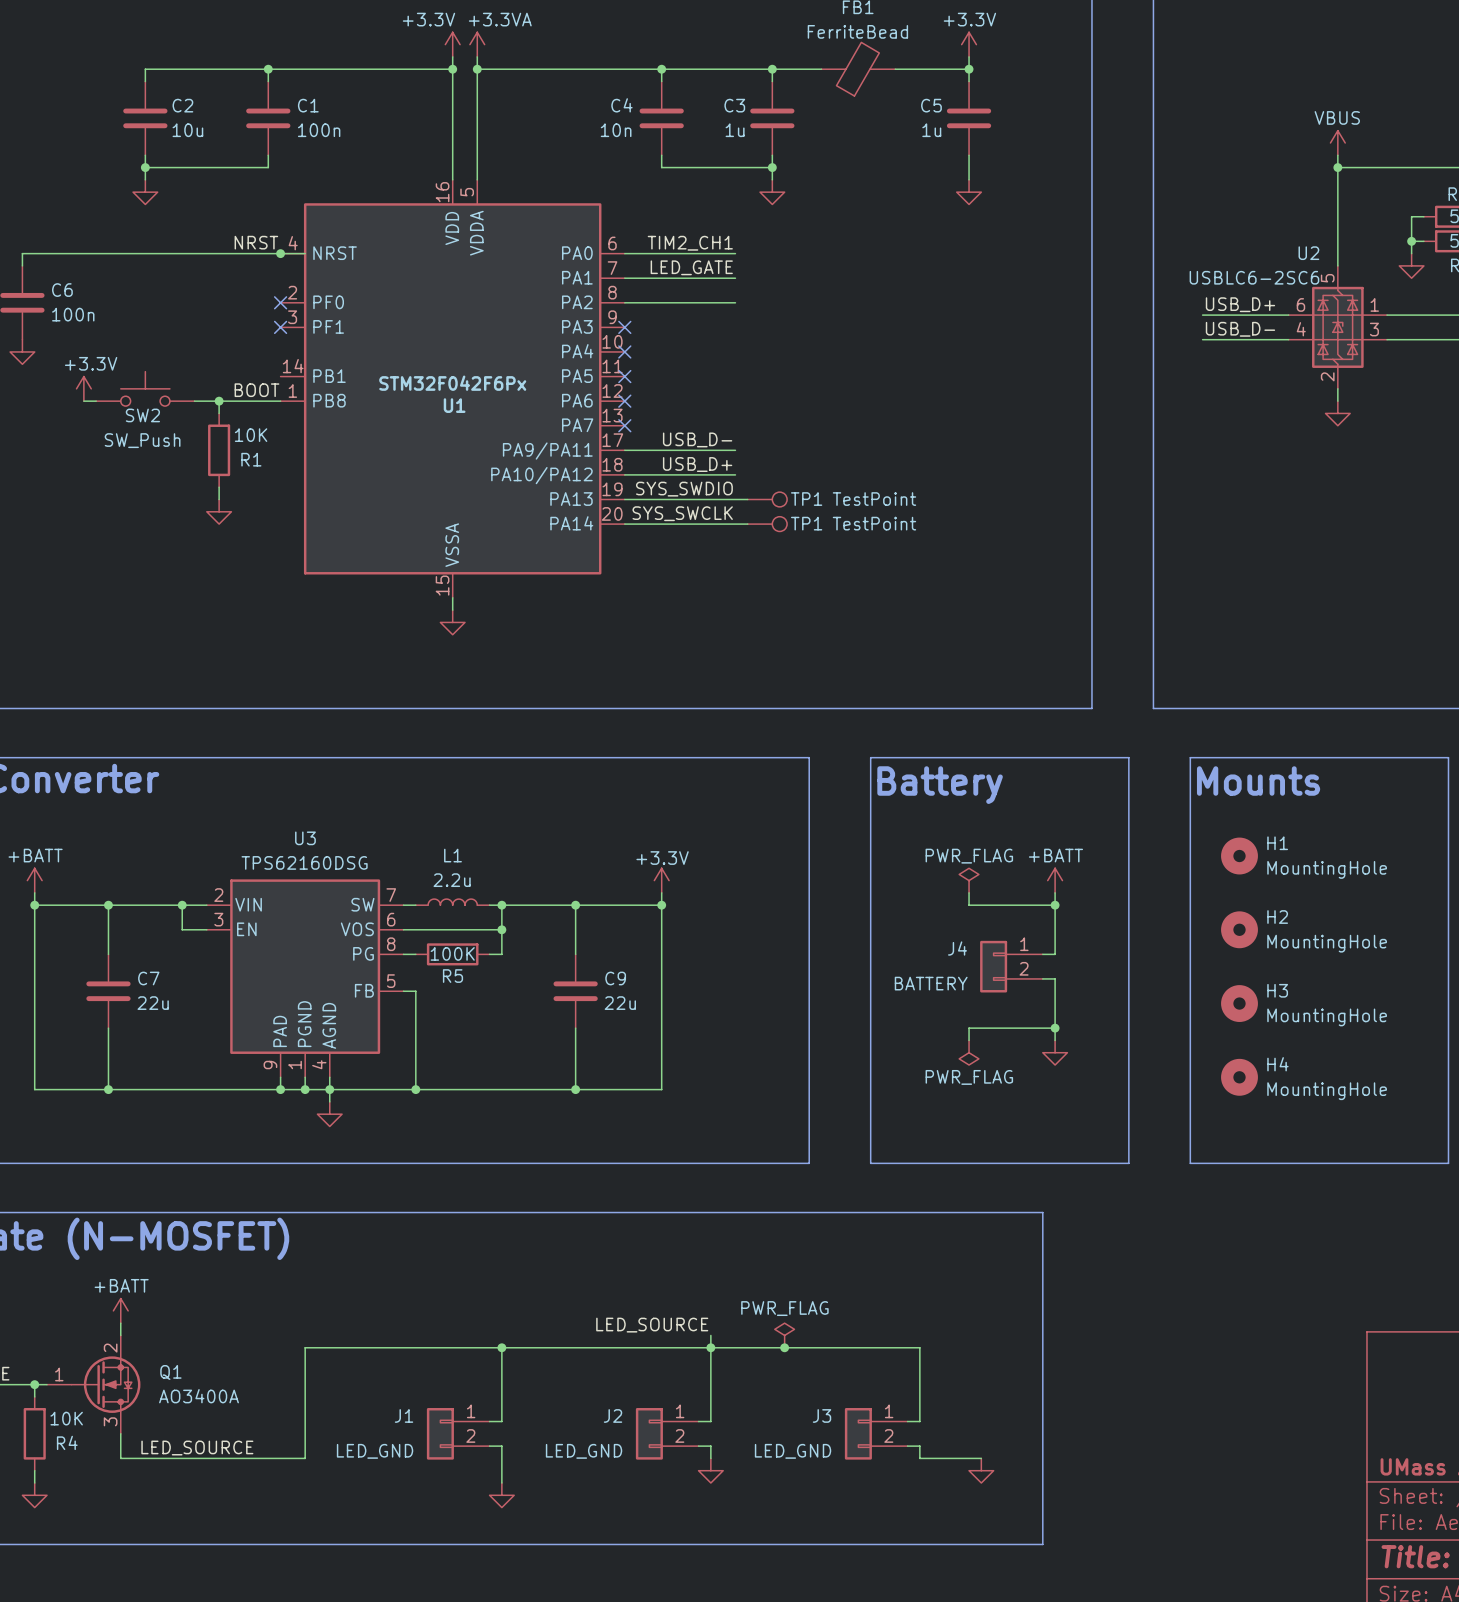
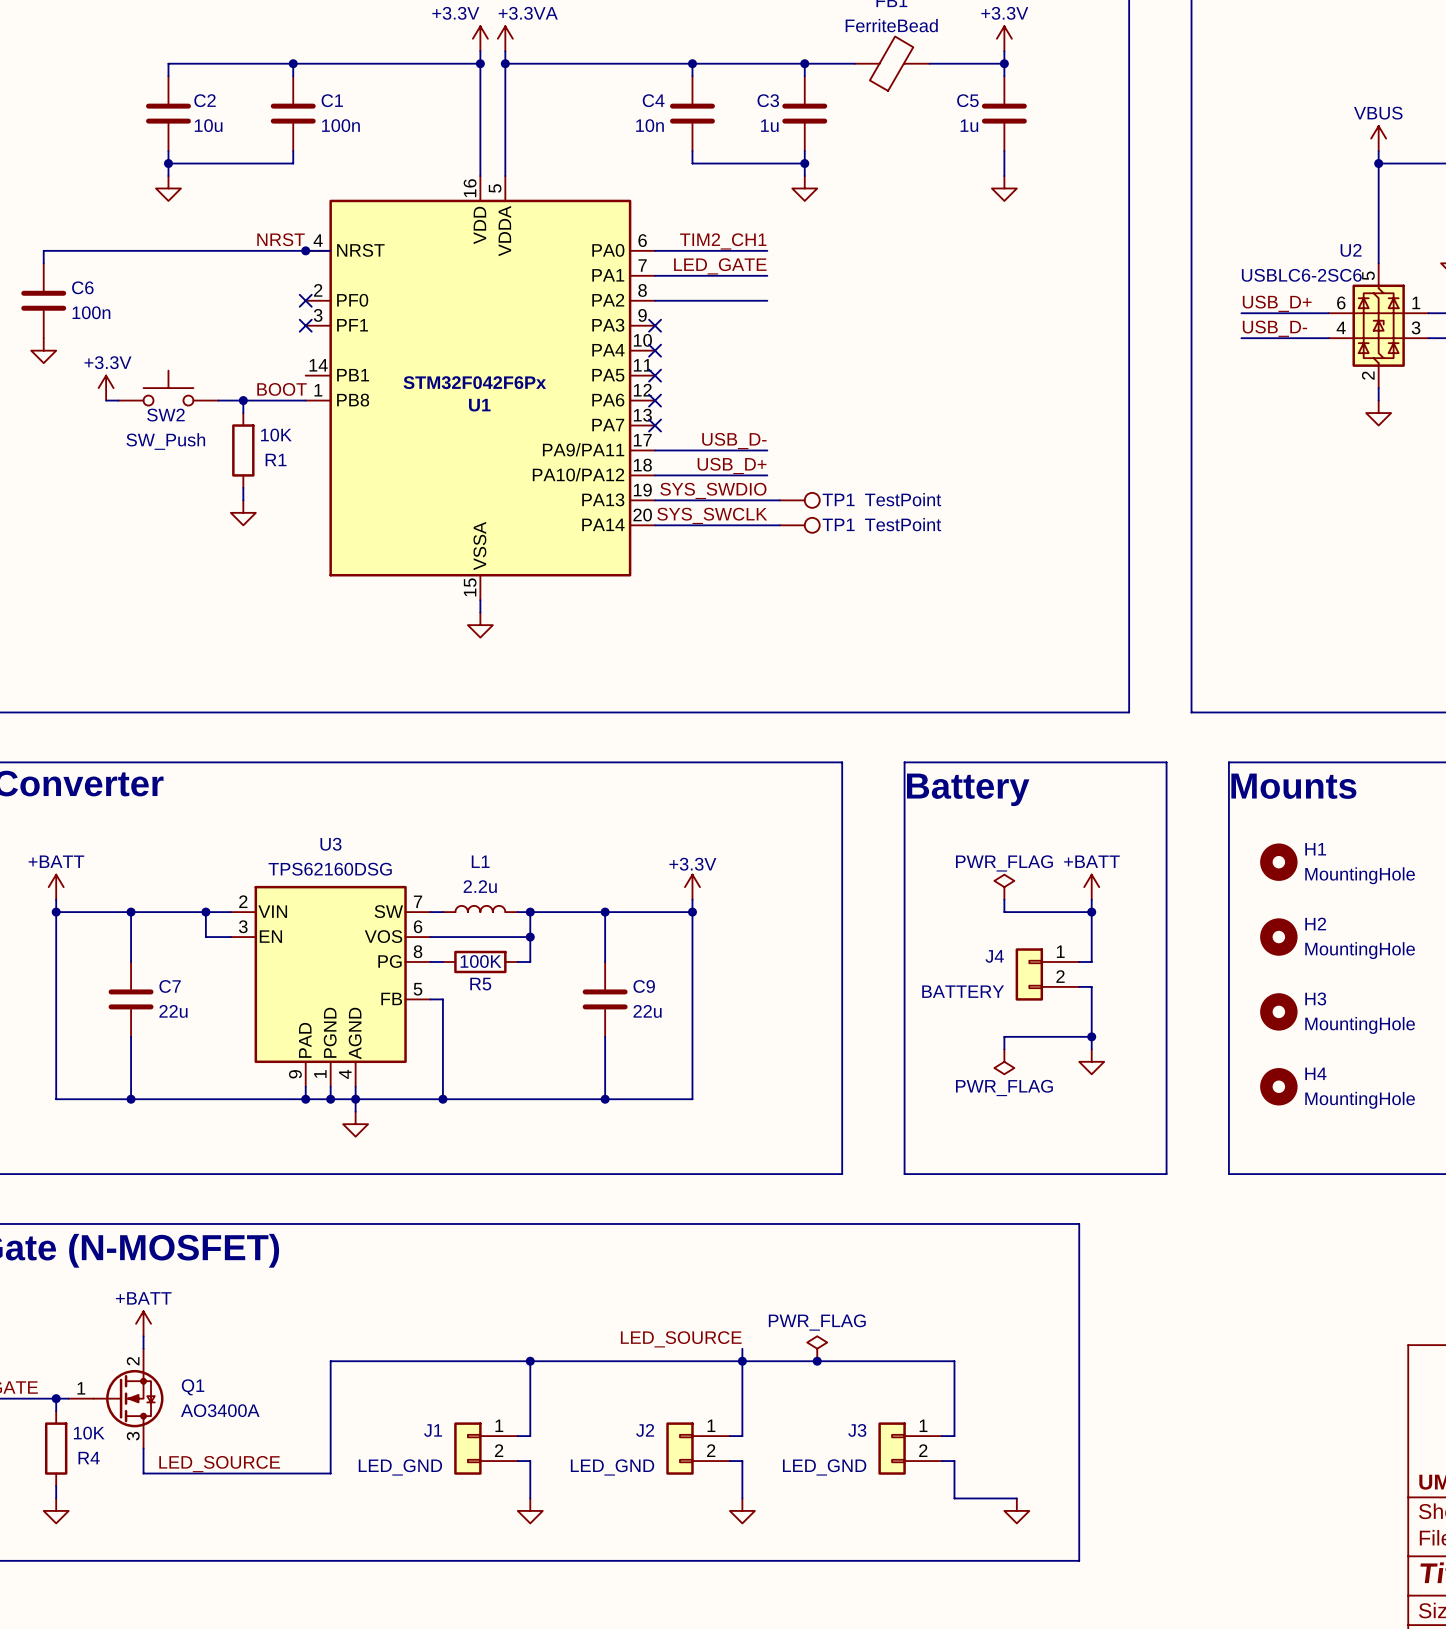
wire: (919, 1458) (981, 1458) -> (954, 1473) (954, 1498) (1016, 1498)
power symbol position: (710, 1470) -> (742, 1510)
power symbol position: (981, 1470) -> (1016, 1510)

